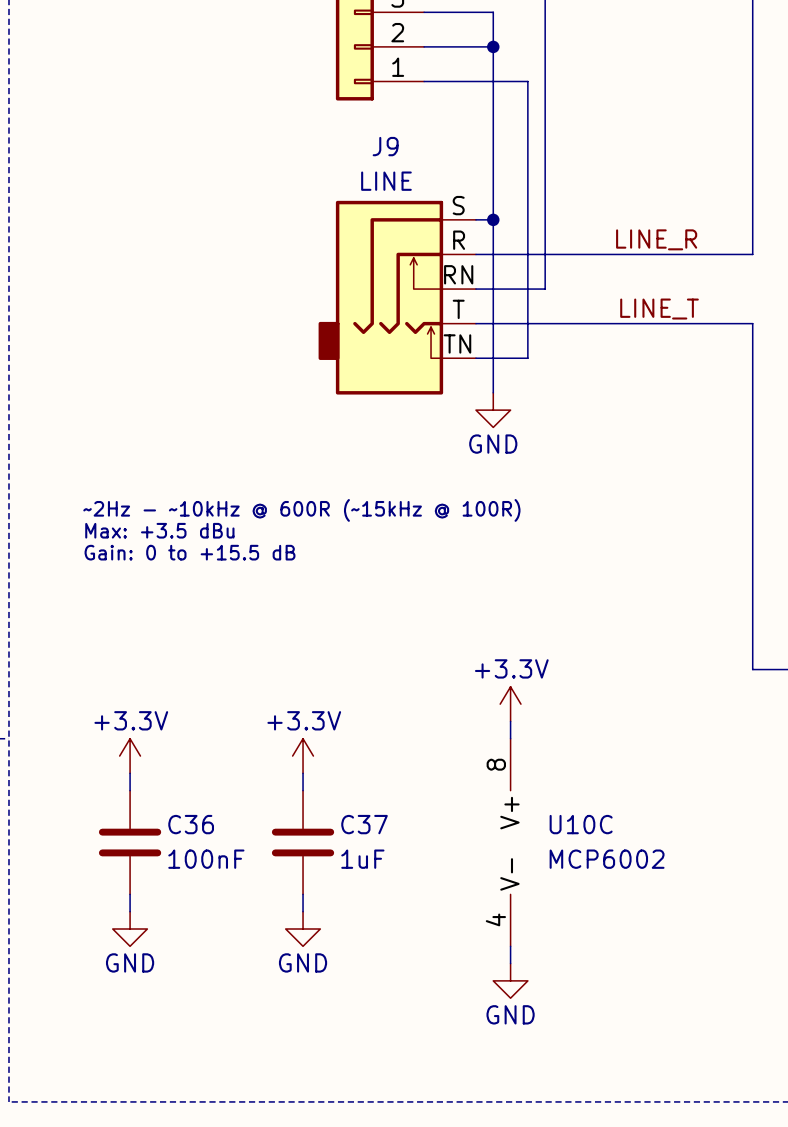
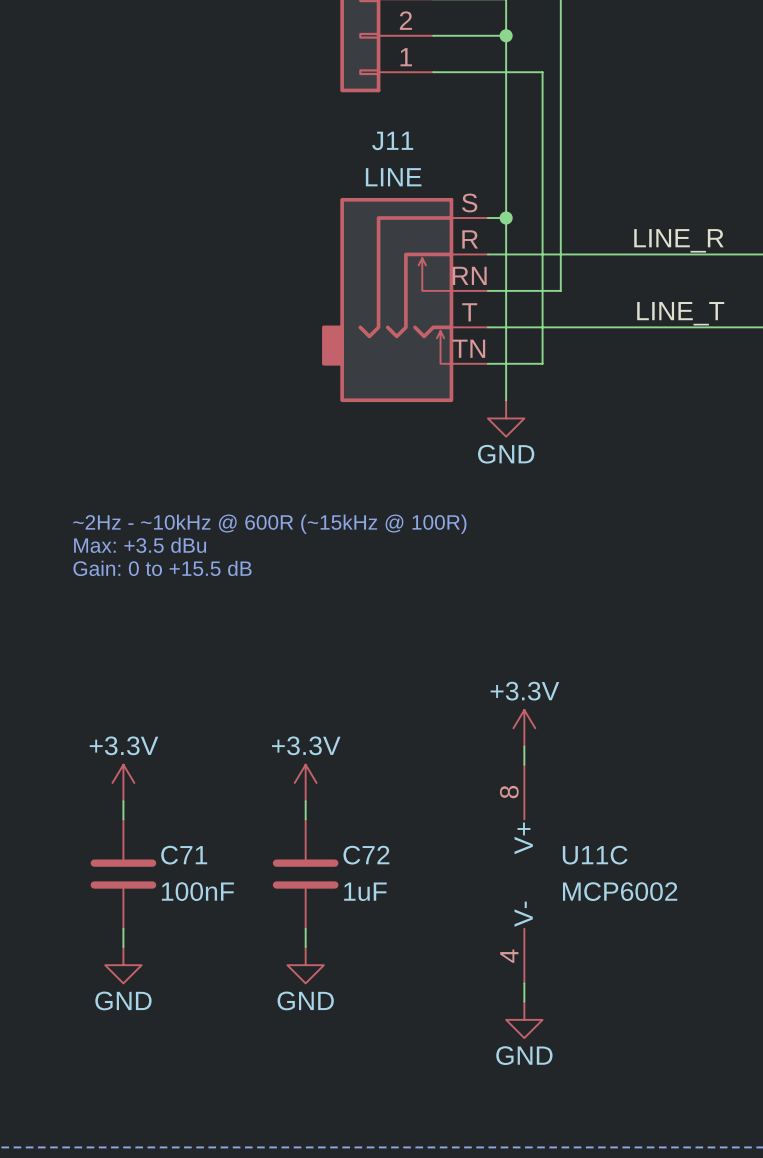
J9 name: J9 (385, 146) -> J11 (392, 140)
C36 name: C36 (191, 824) -> C71 (184, 855)
C37 name: C37 (364, 824) -> C72 (366, 855)
U10C name: U10C (581, 824) -> U11C (595, 855)

